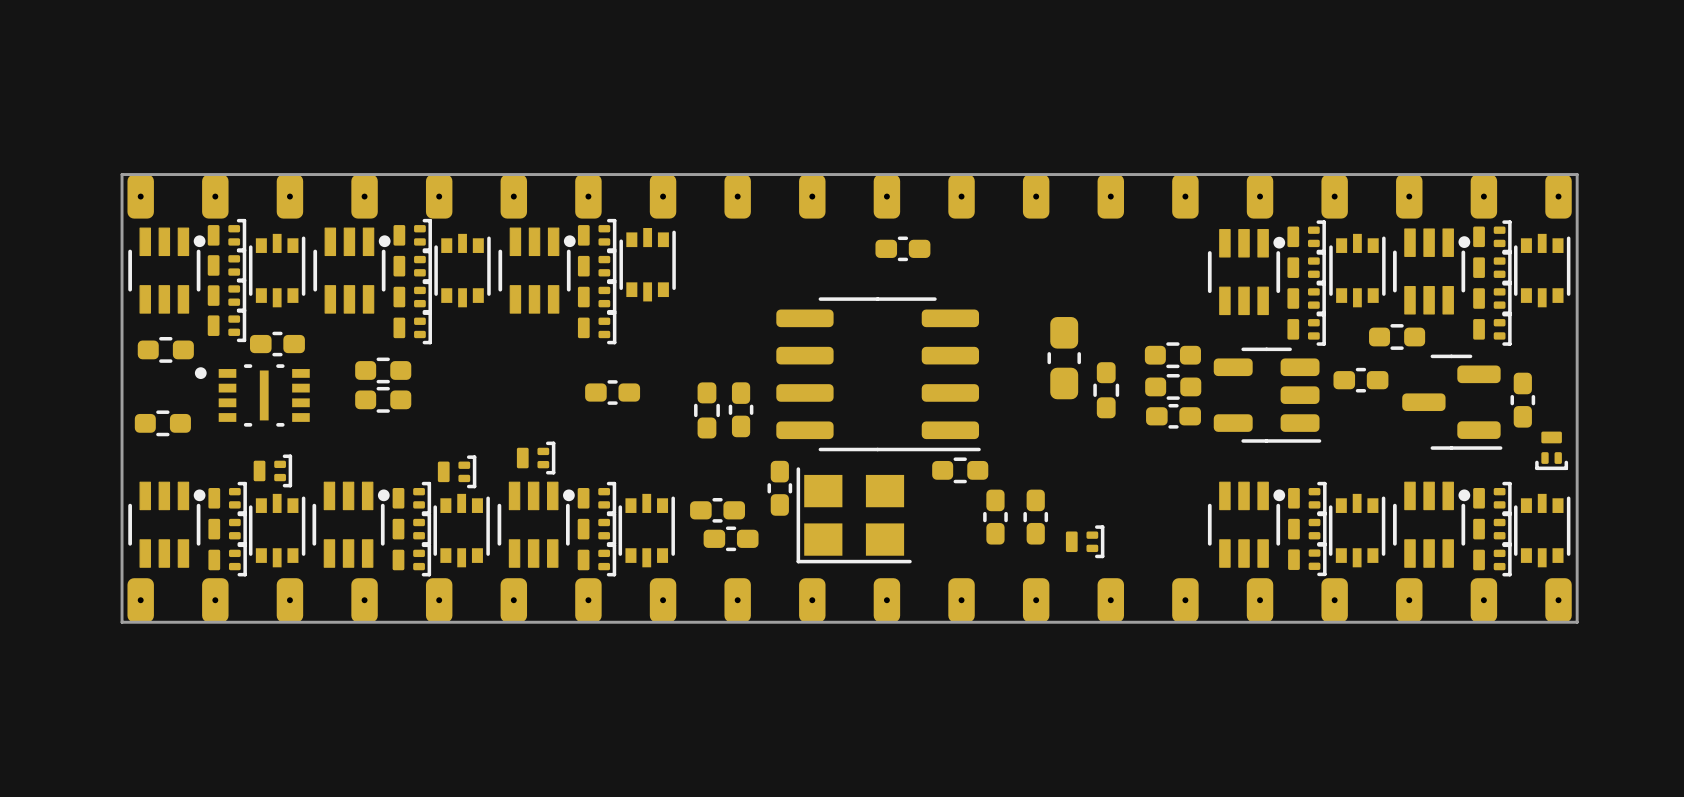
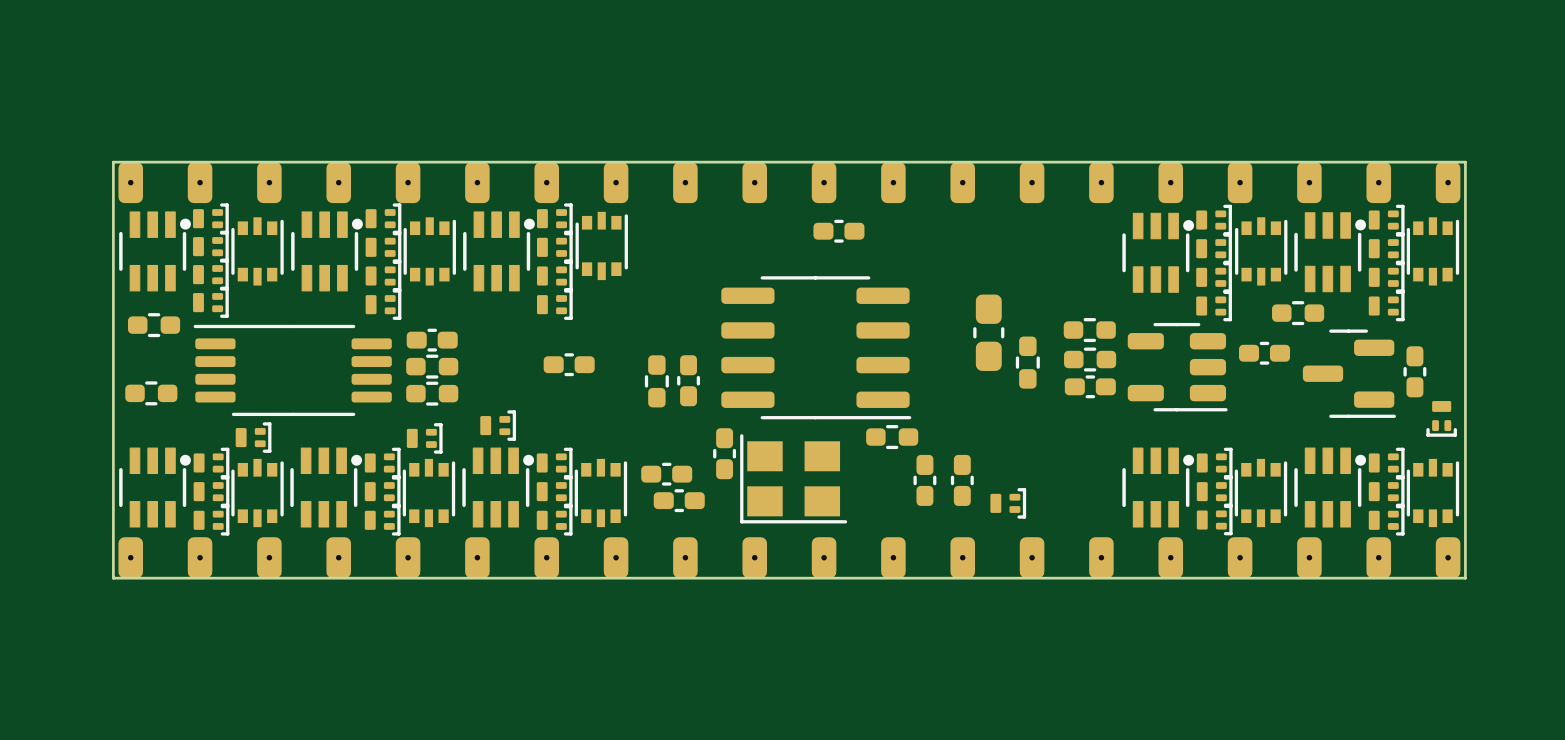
part position: (277, 344) -> (432, 340)
part: (383, 370) -> none
part: none -> (432, 366)
part: (252, 395) -> none
part: none -> (292, 370)
part: (383, 399) -> none
part: none -> (432, 393)

